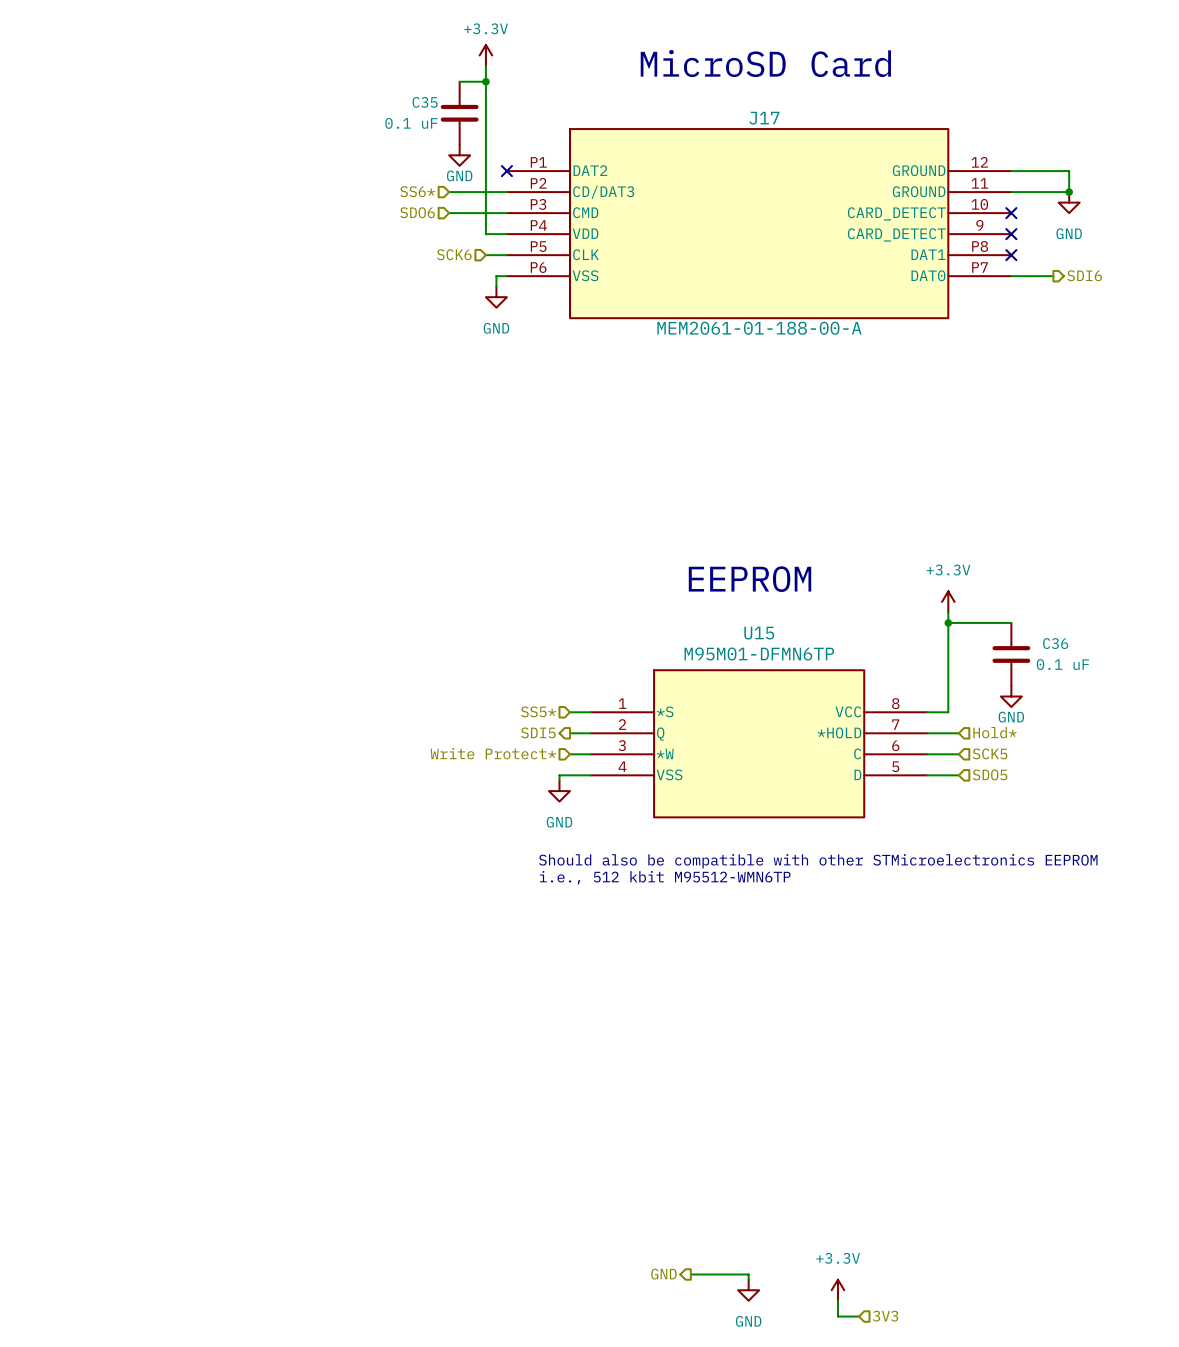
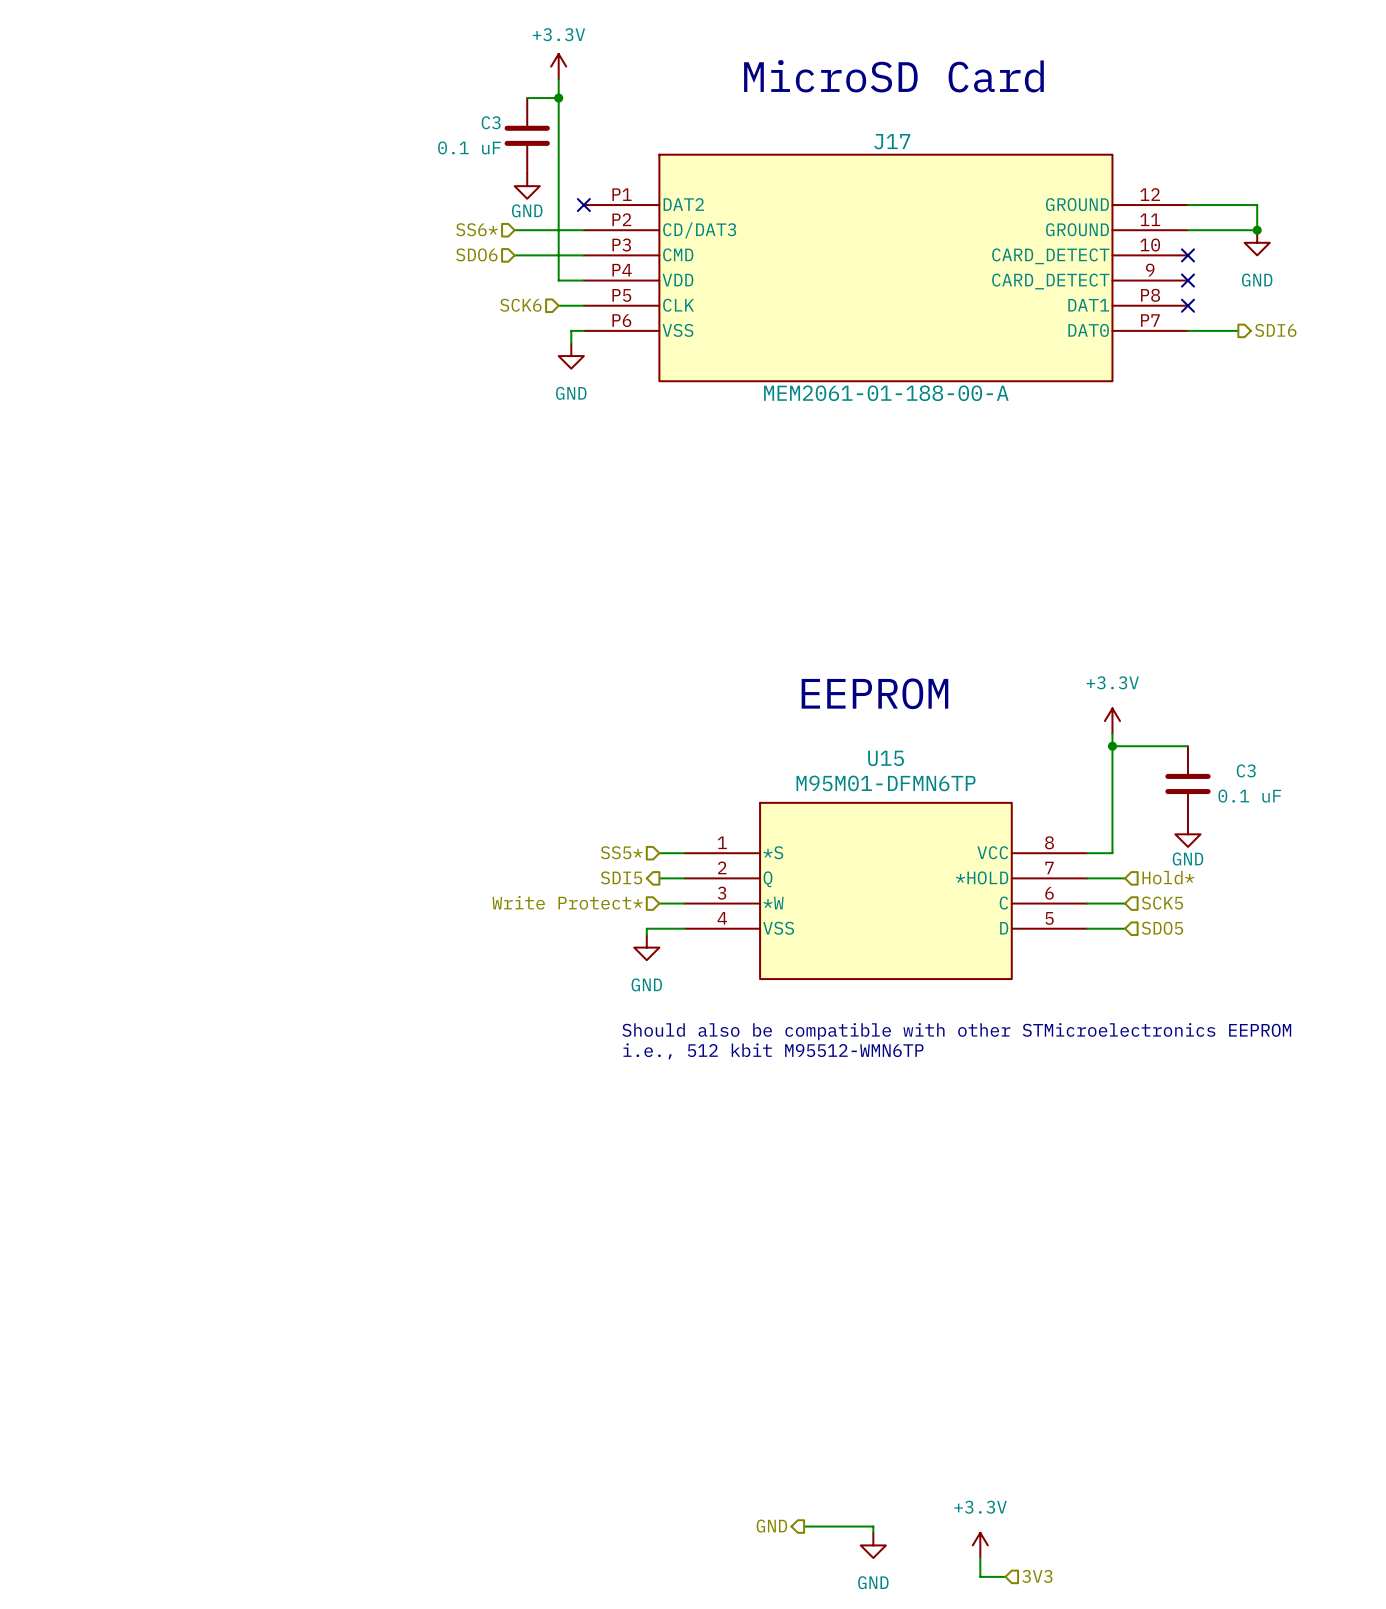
C35 name: C35 (425, 102) -> C3 (491, 122)
C36 name: C36 (1055, 643) -> C3 (1246, 770)

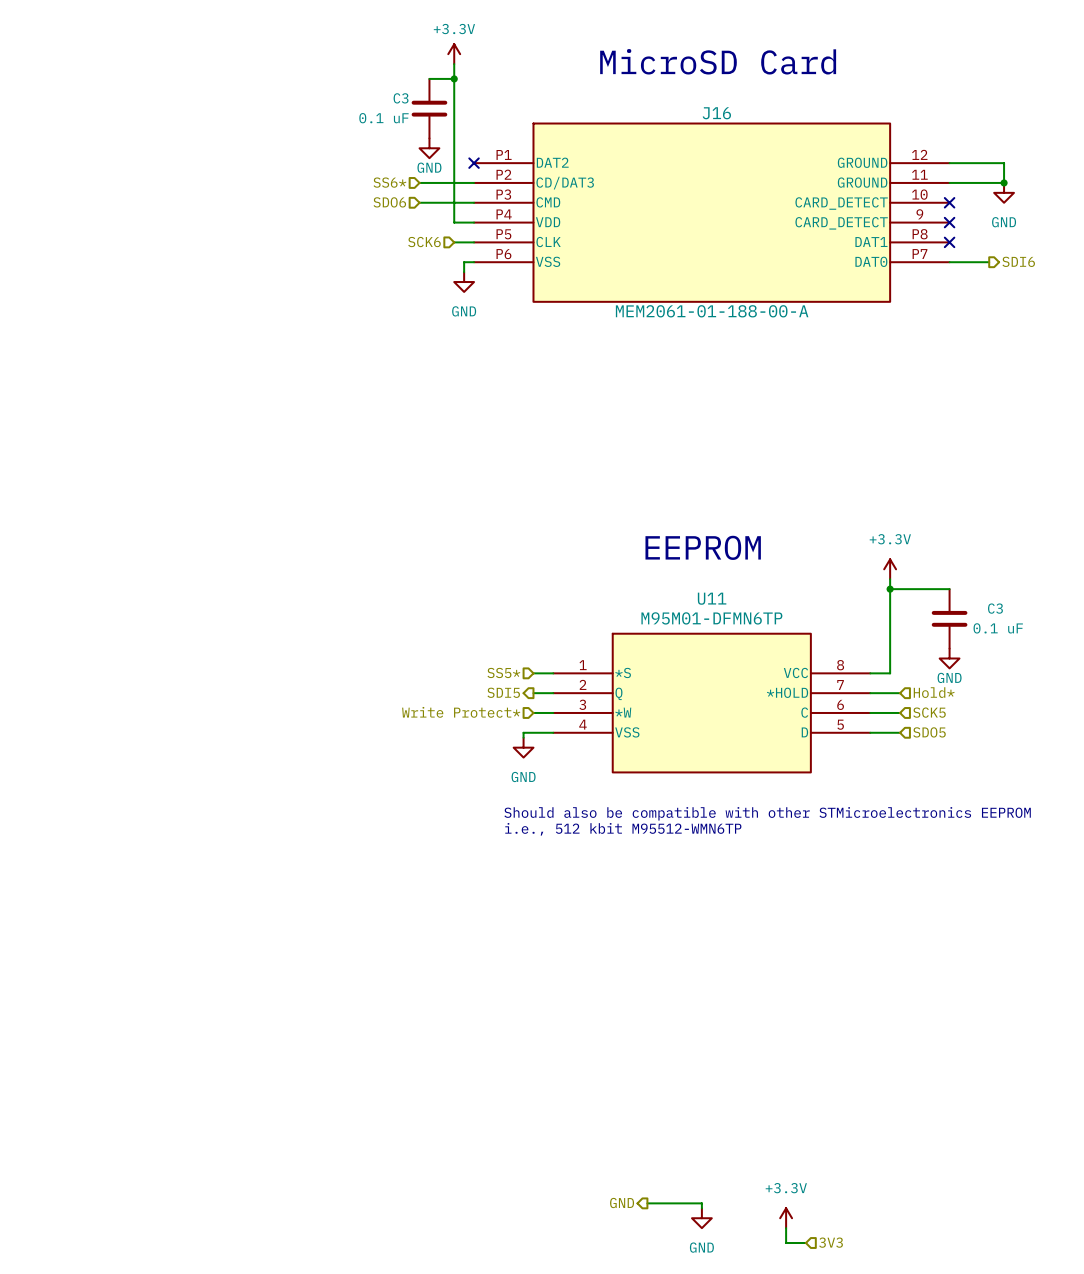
J17 name: J17 (892, 141) -> J16 (716, 113)
U15 name: U15 (886, 758) -> U11 (712, 598)

